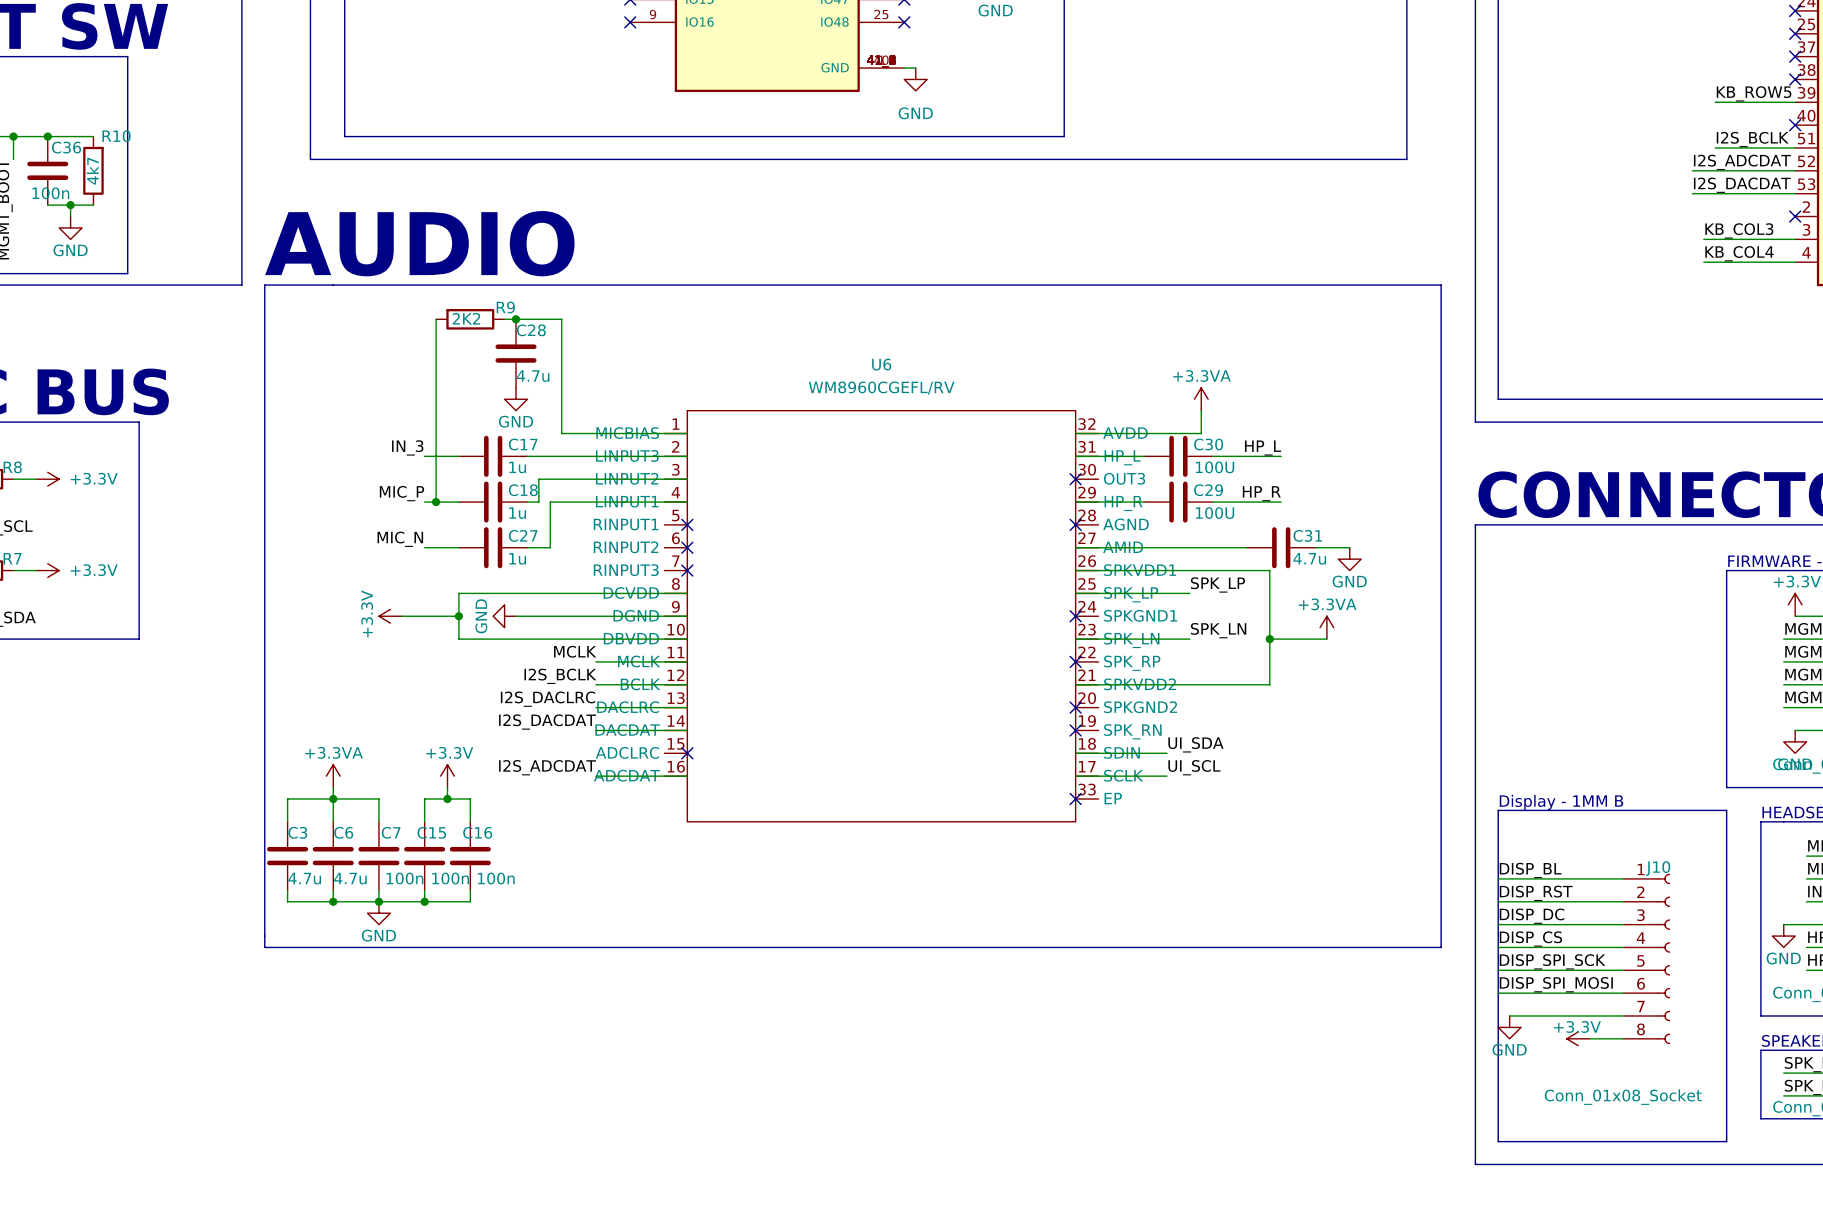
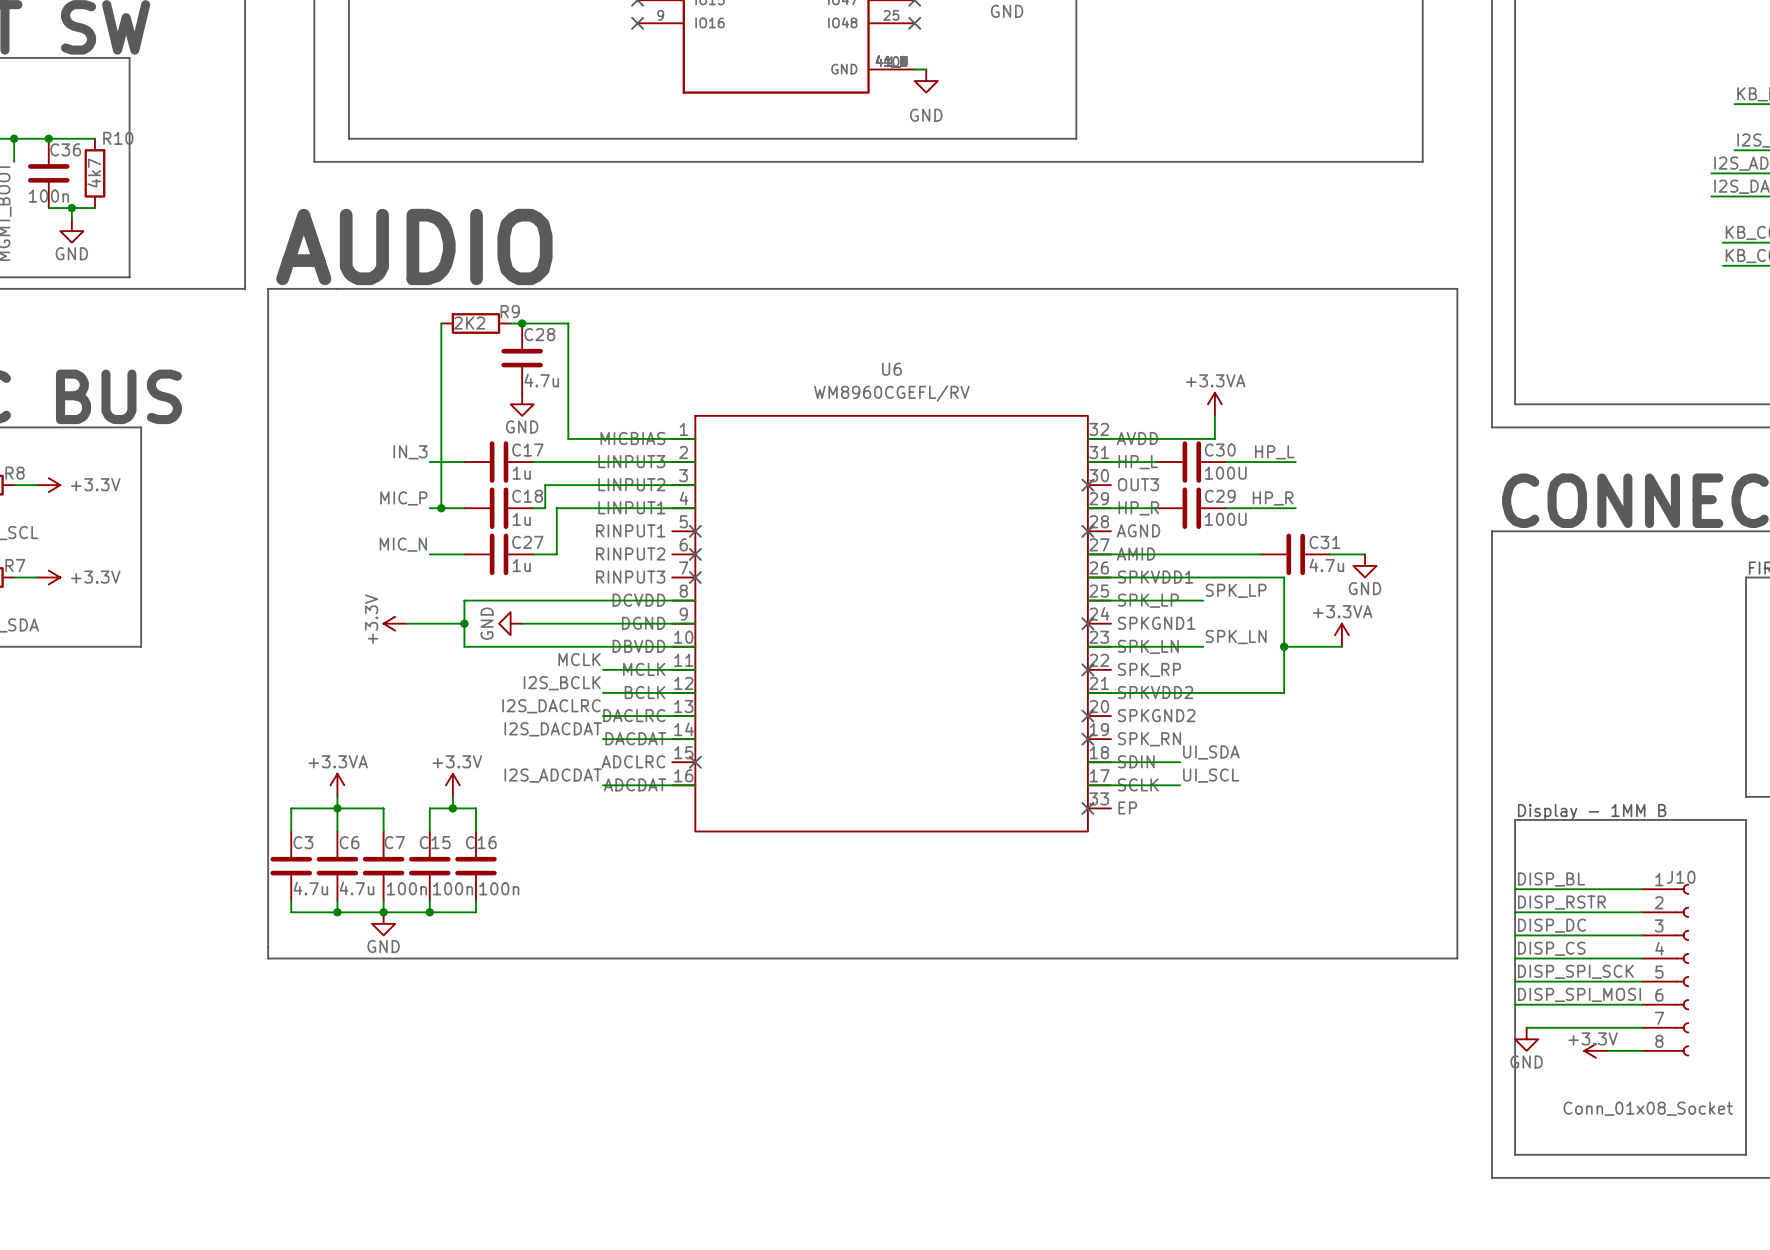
label: DISP_RST (1536, 893) -> DISP_RSTR (1561, 902)

